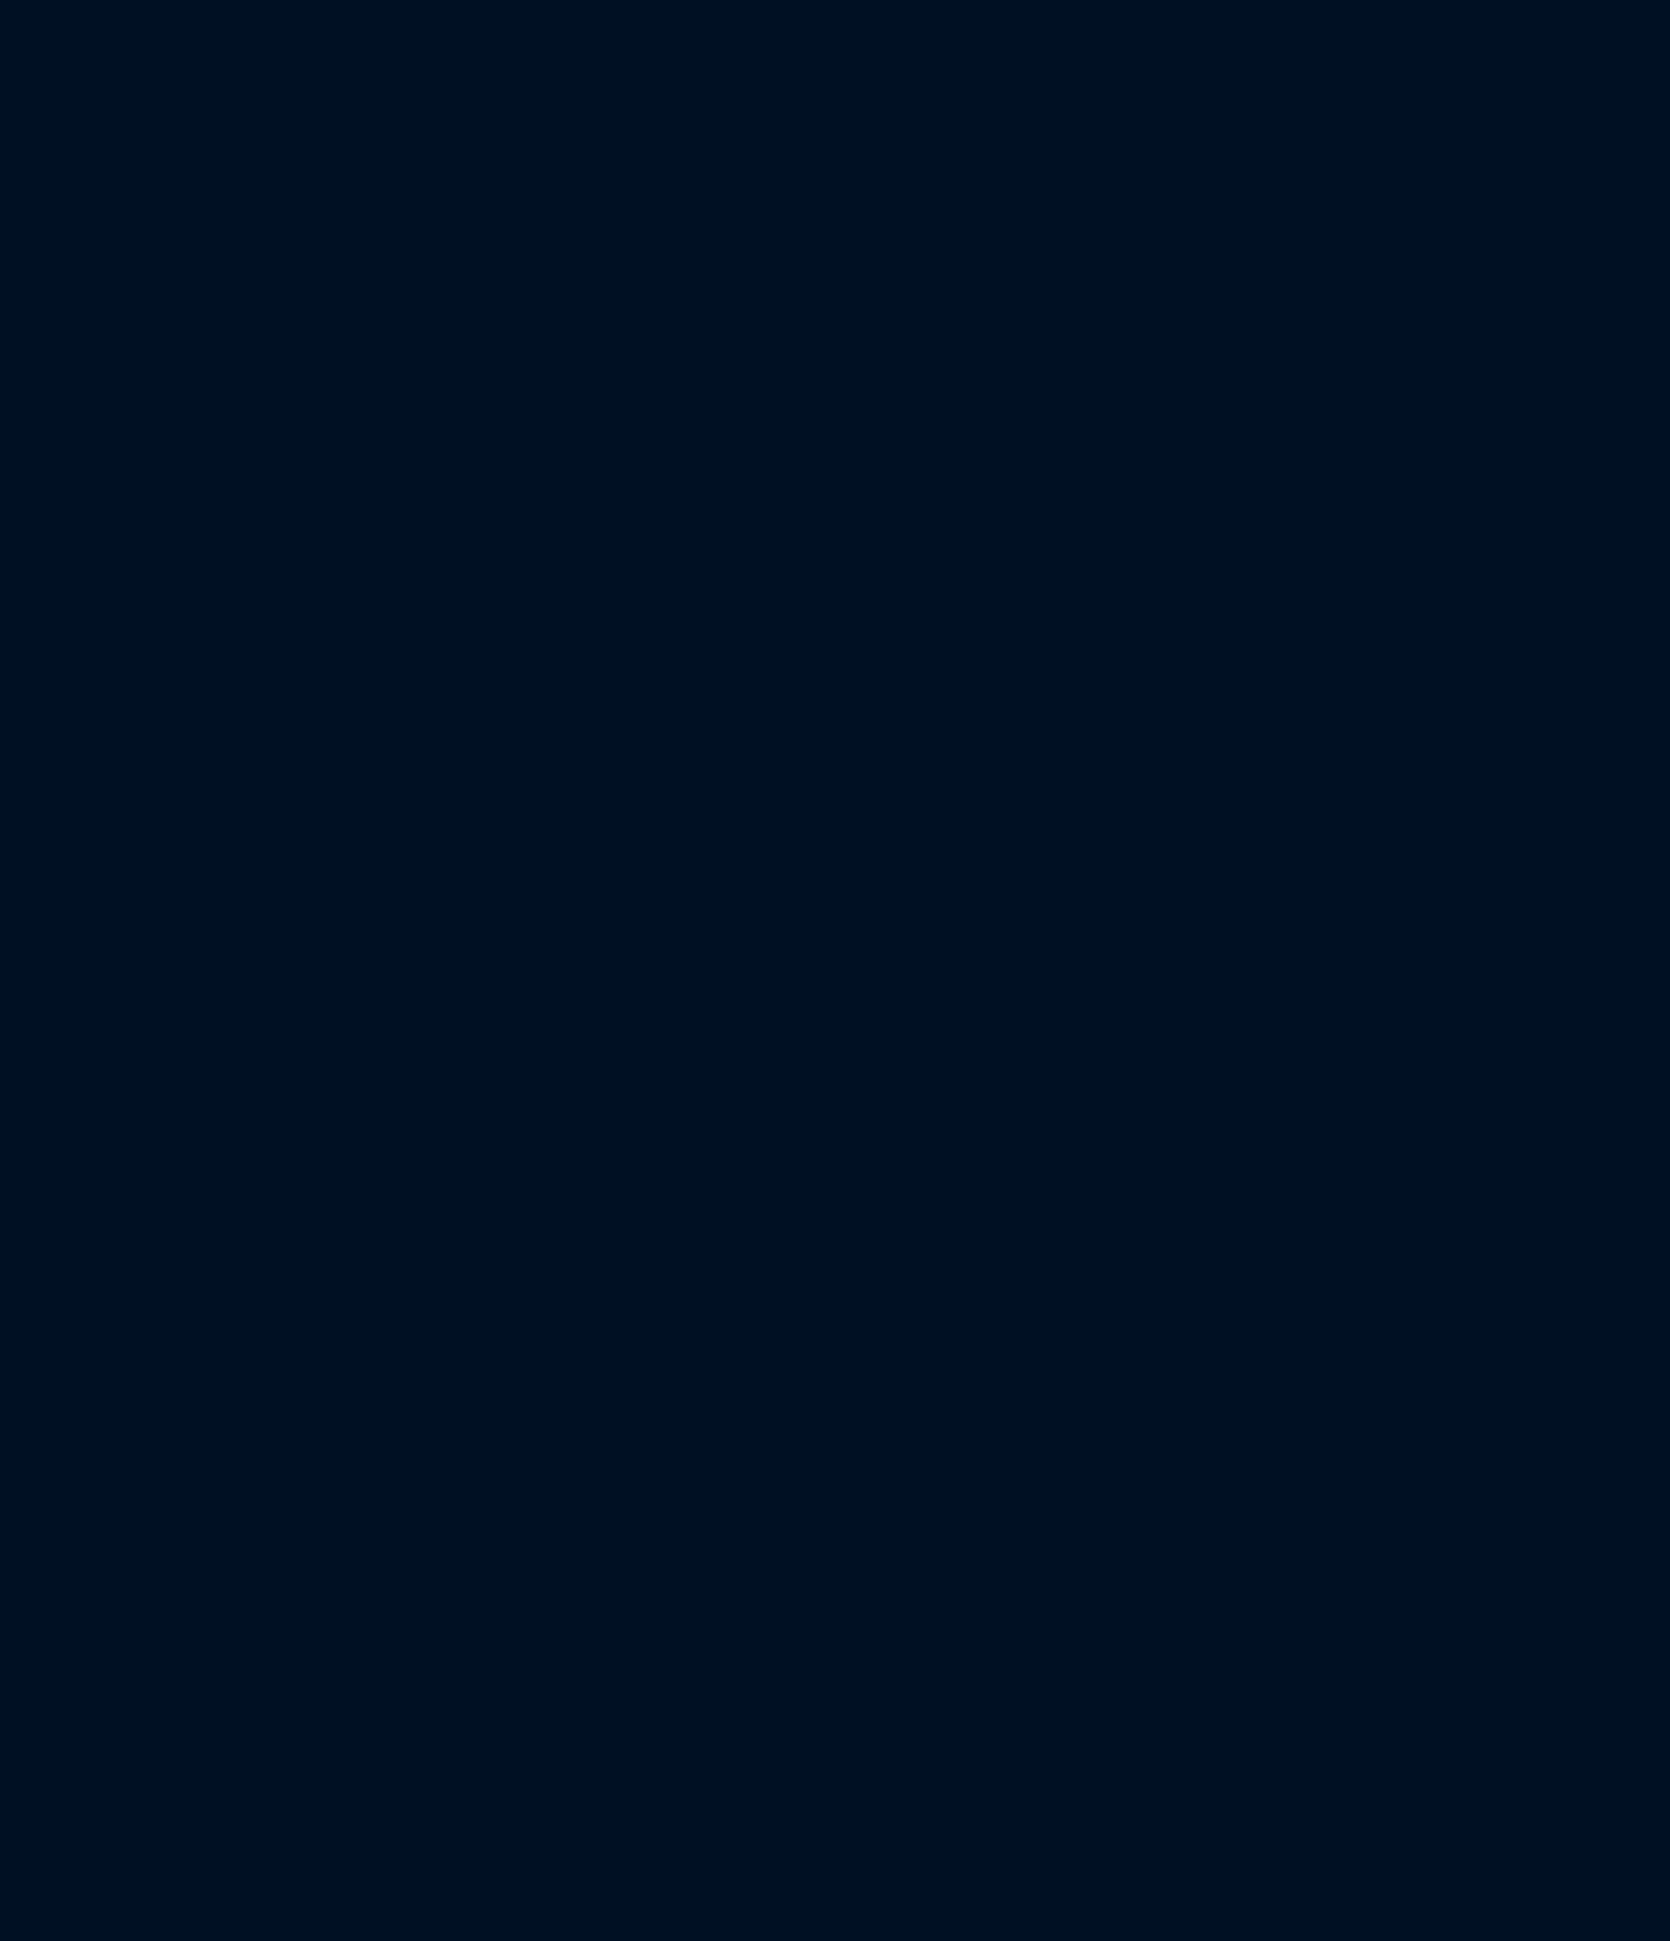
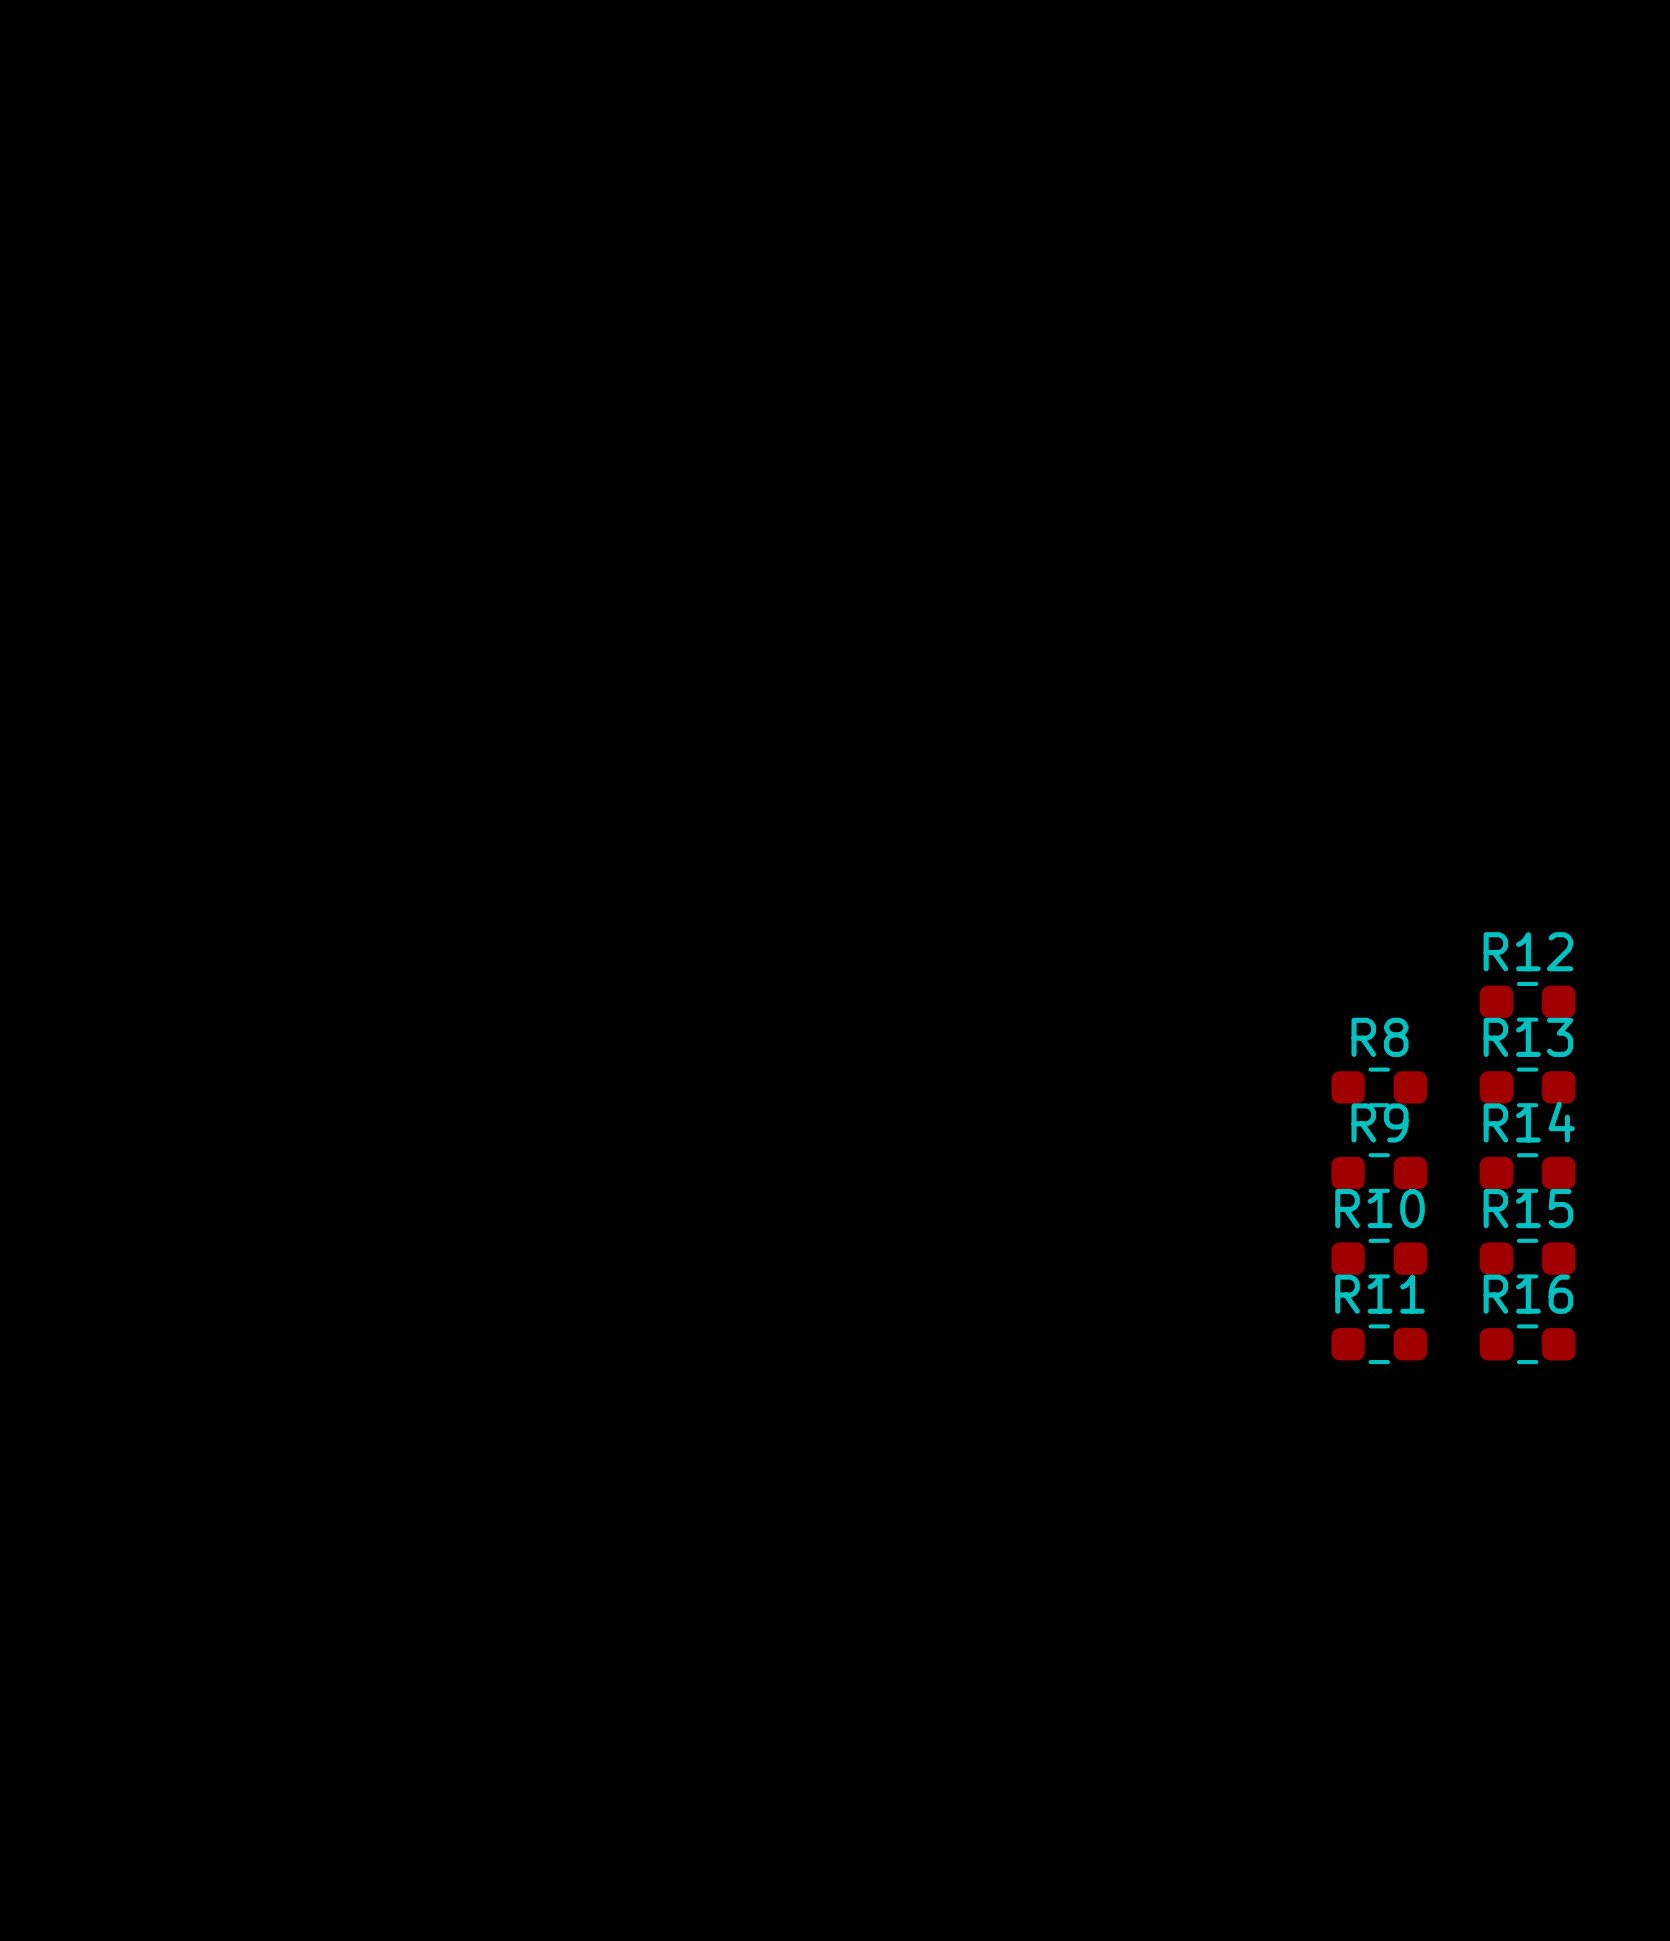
R12: none -> (1527, 1001)
R8: none -> (1379, 1087)
R13: none -> (1527, 1087)
R9: none -> (1379, 1173)
R14: none -> (1527, 1173)
R10: none -> (1379, 1258)
R15: none -> (1527, 1258)
R11: none -> (1379, 1344)
R16: none -> (1527, 1344)

